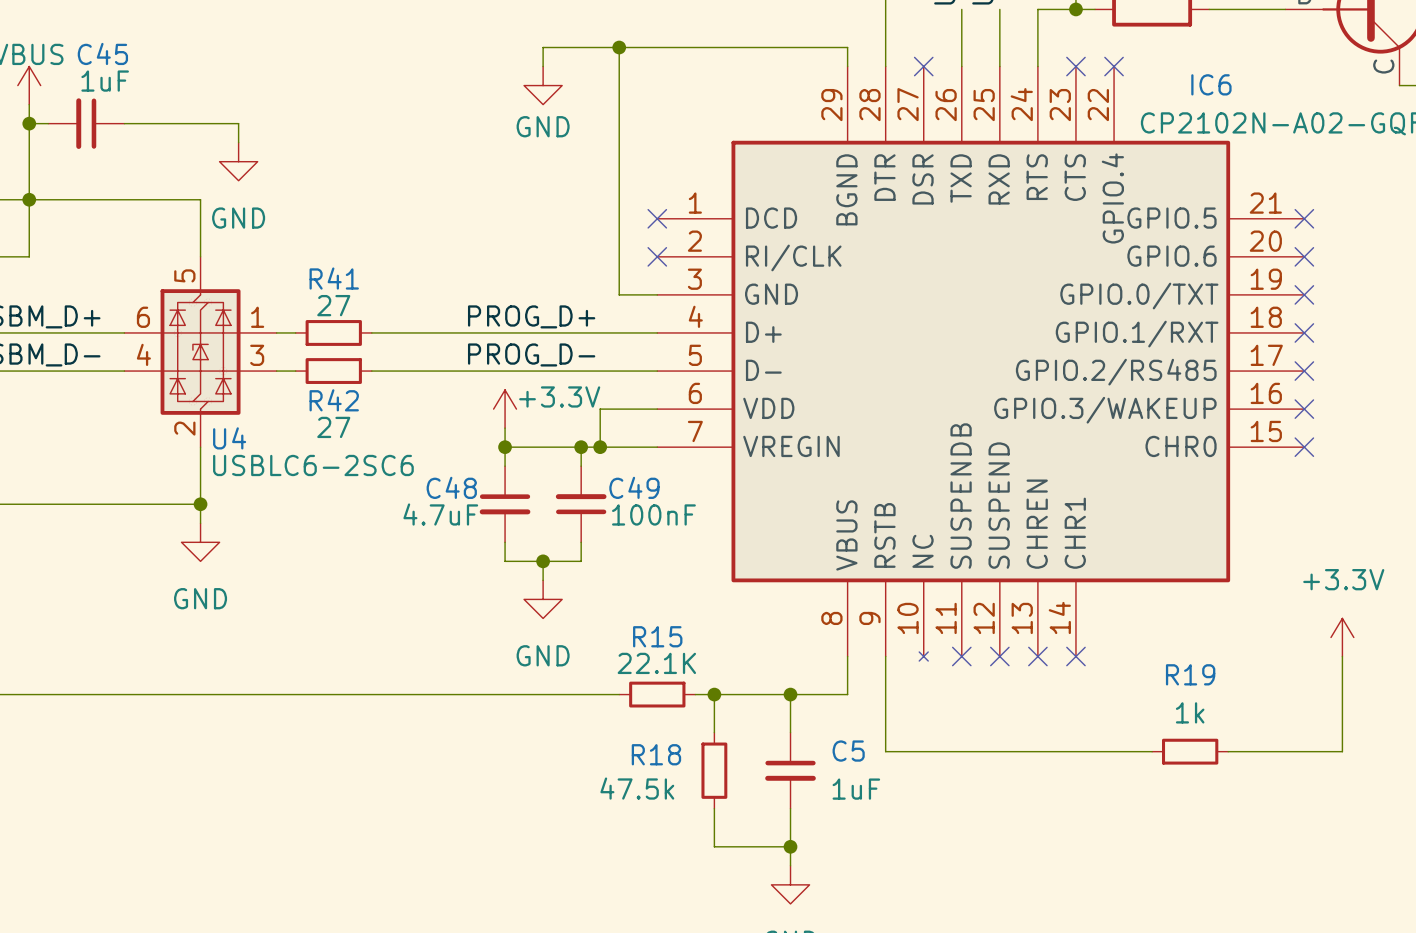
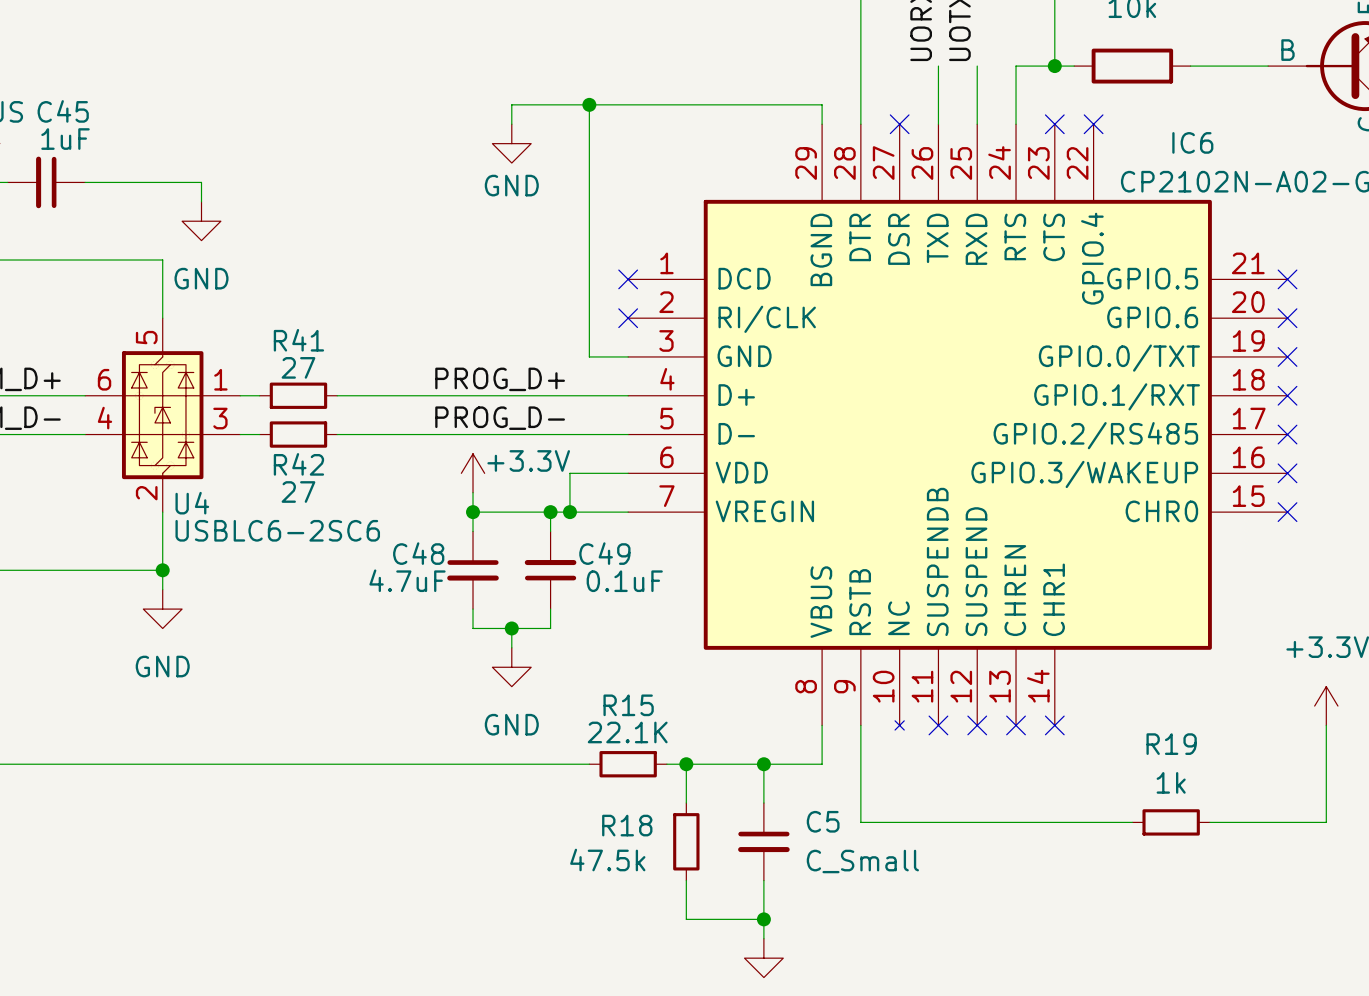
C49 value: 100nF (653, 514) -> 0.1uF (624, 581)
C5 value: 1uF (856, 789) -> C_Small (862, 861)

